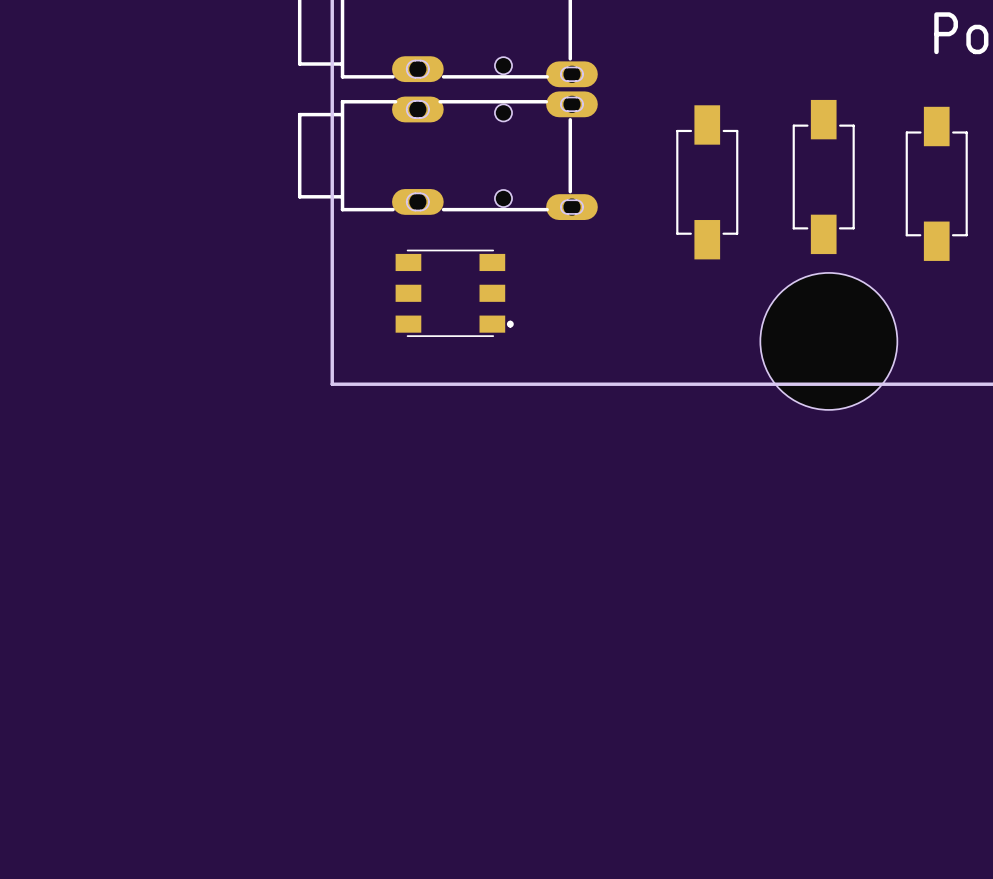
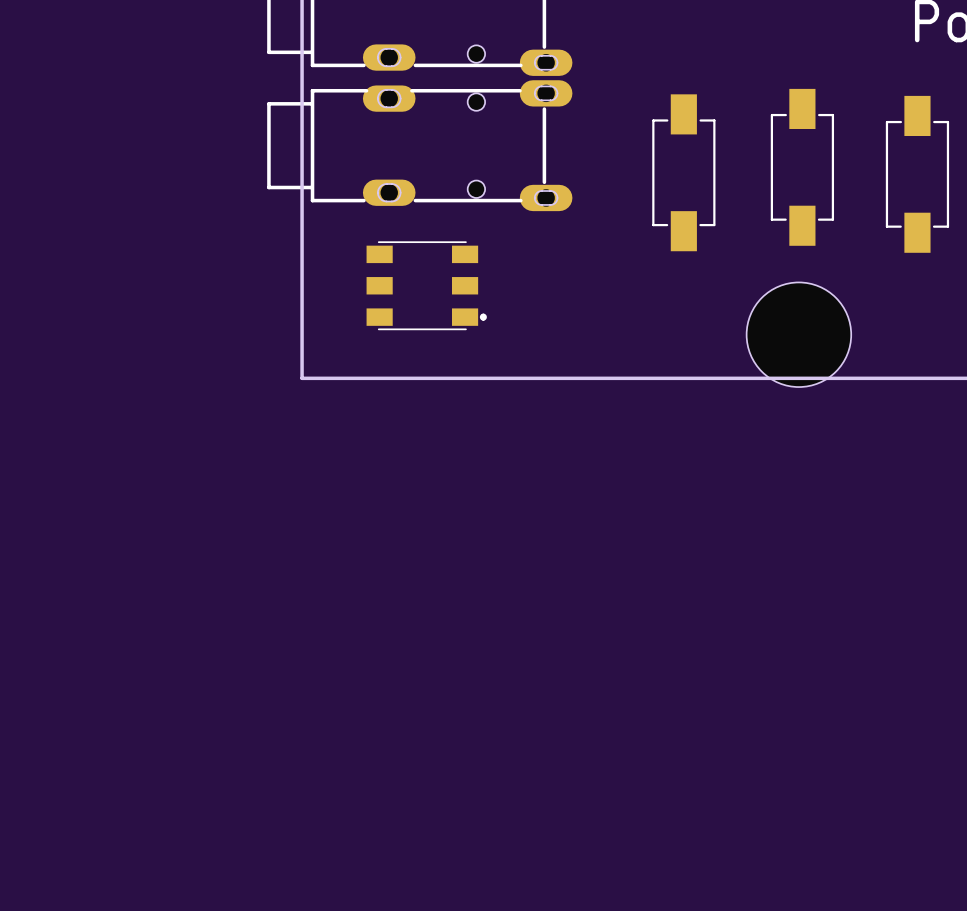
hole size: [760, 272, 898, 410] -> [746, 282, 852, 388]

